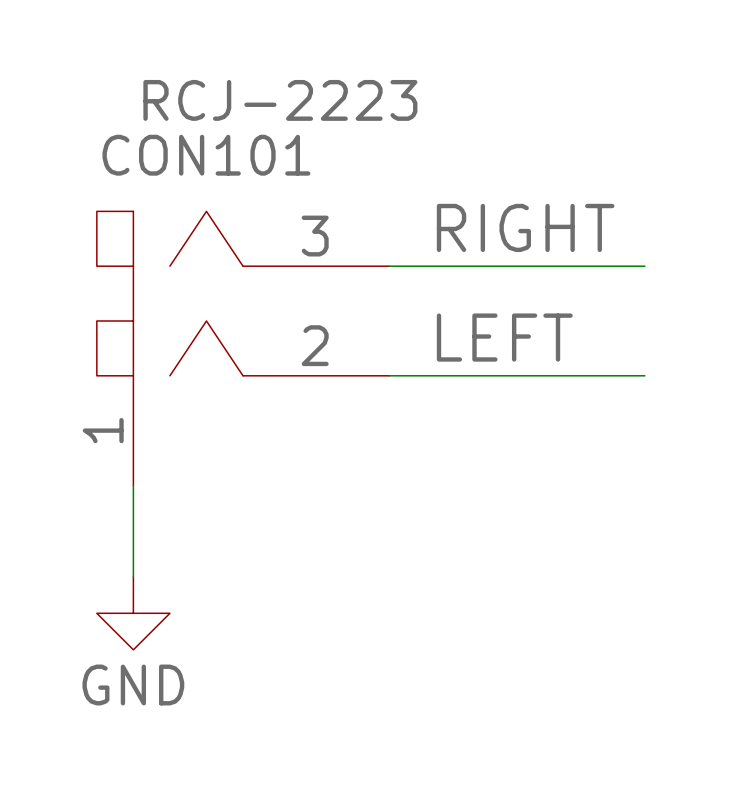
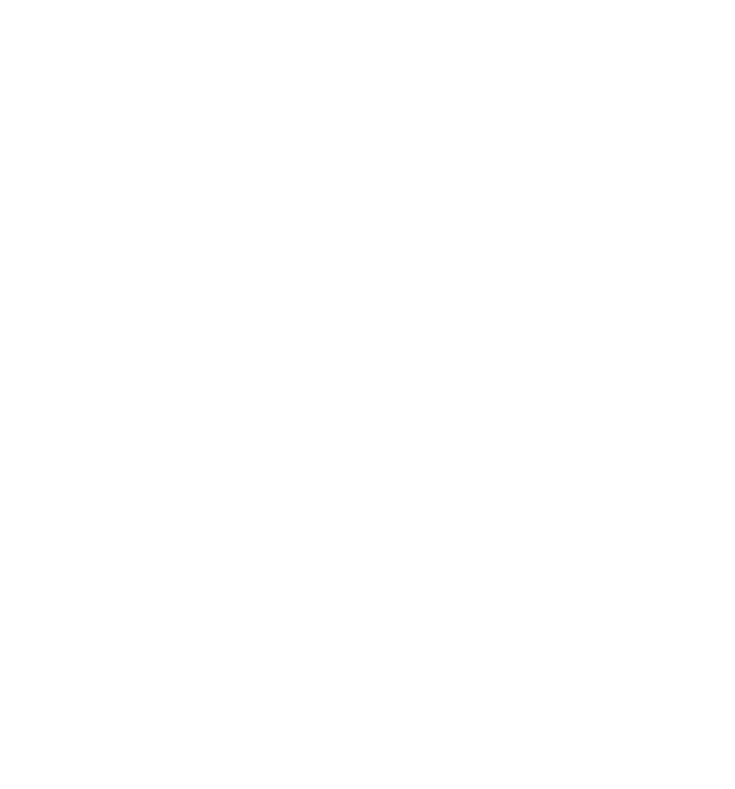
label: RIGHT (525, 227) -> none
wire: (389, 266) (644, 266) -> none
label: LEFT (504, 337) -> none
CON101: RCJ-2223 (242, 348) -> none
wire: (389, 375) (644, 375) -> none
wire: (133, 485) (133, 576) -> none
power symbol: GND (133, 613) -> none

